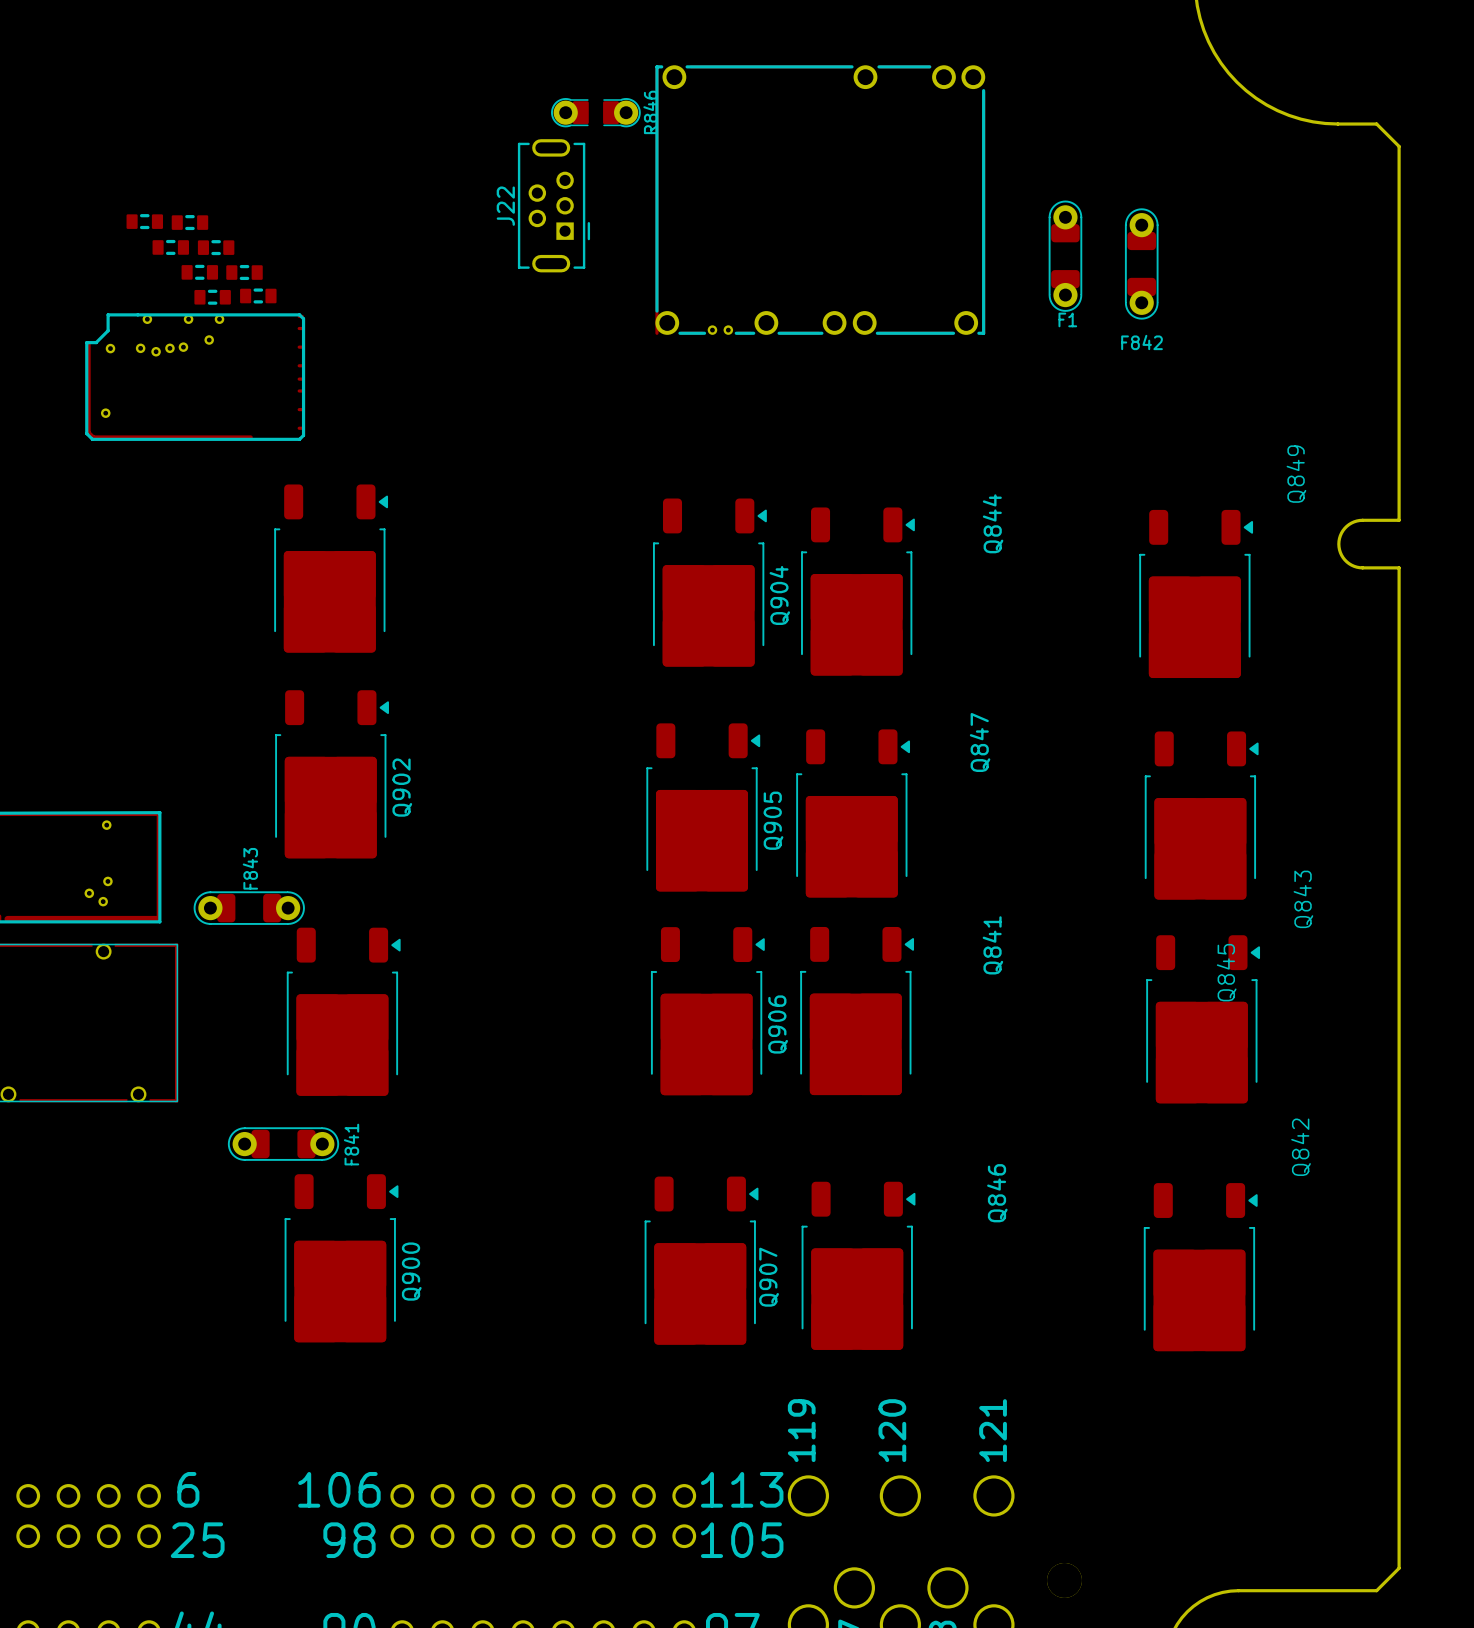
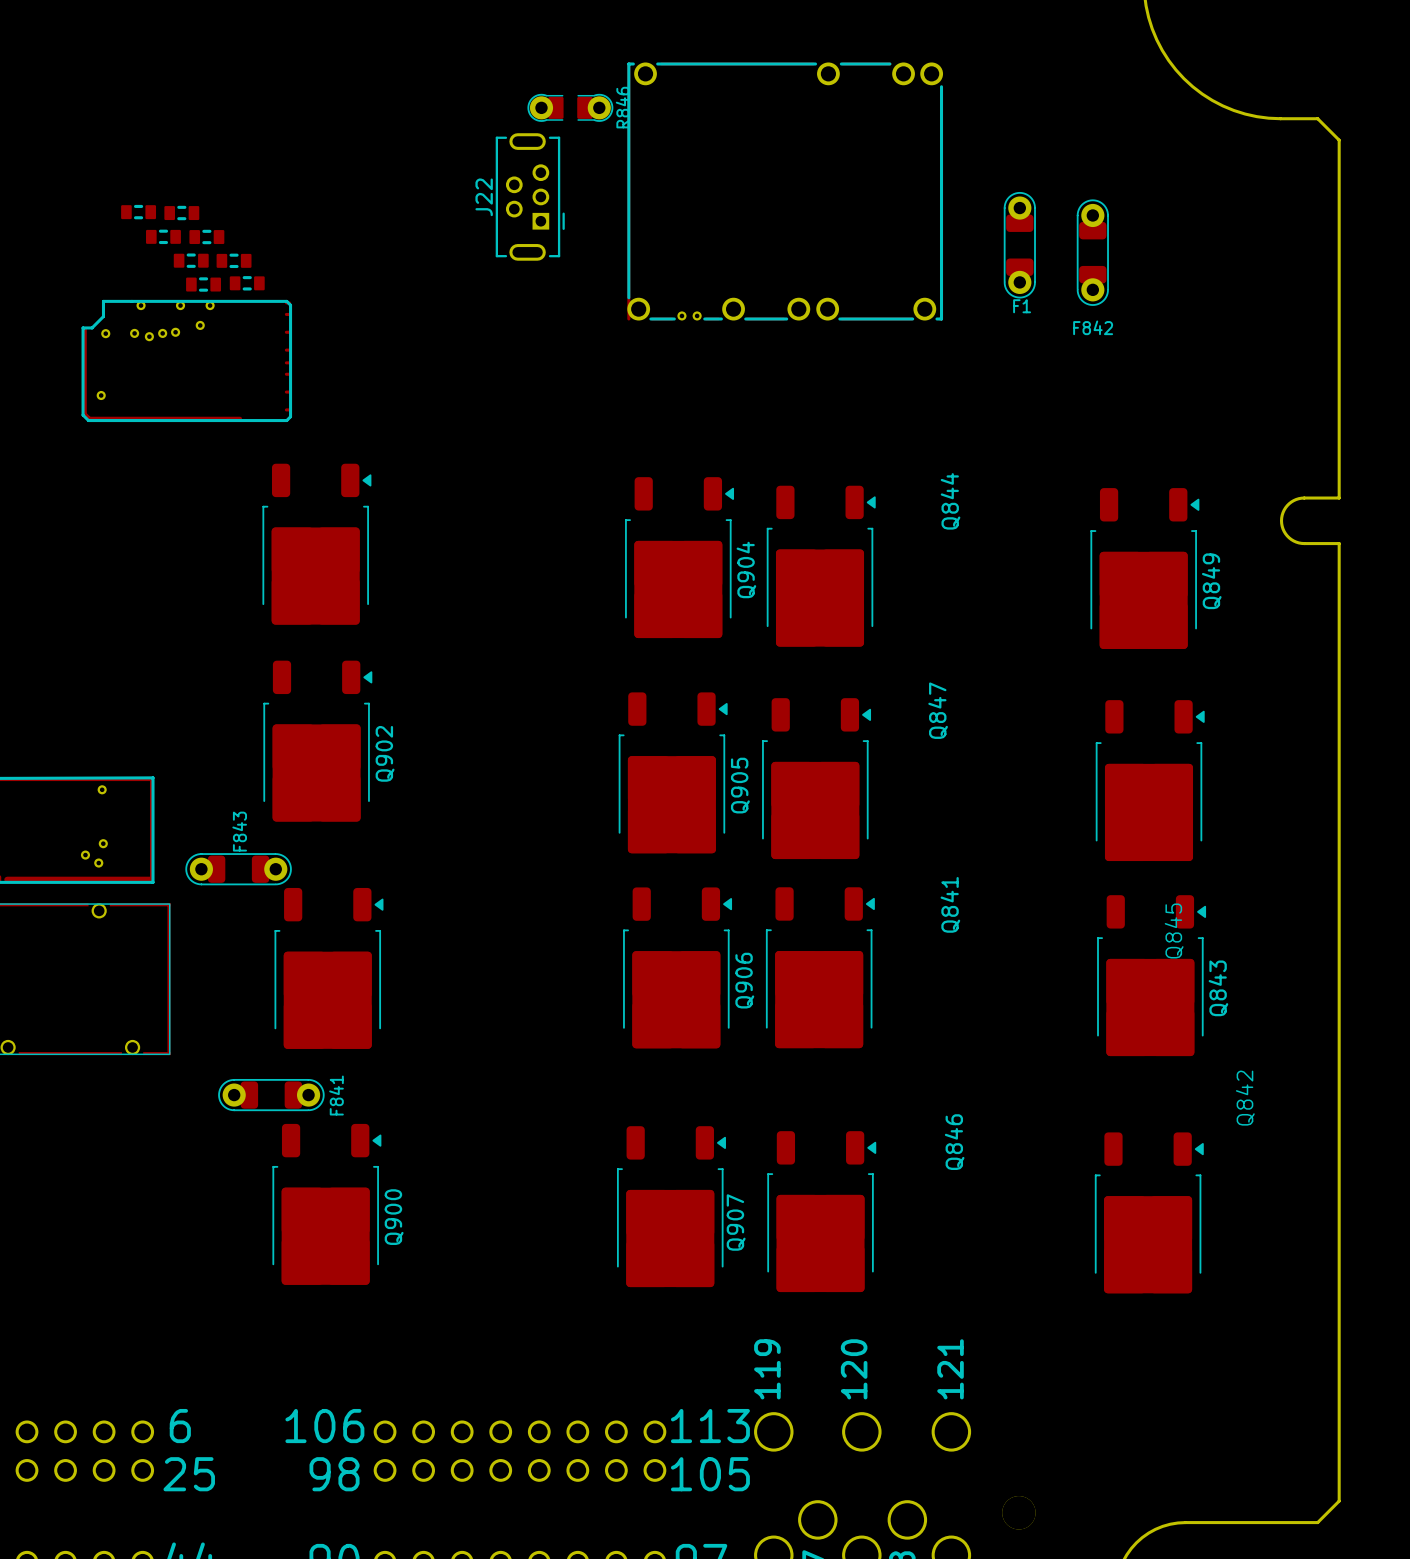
Q849 name position: Q849 (1296, 474) -> Q849 (1211, 581)
Q843 name position: Q843 (1303, 899) -> Q843 (1218, 988)

